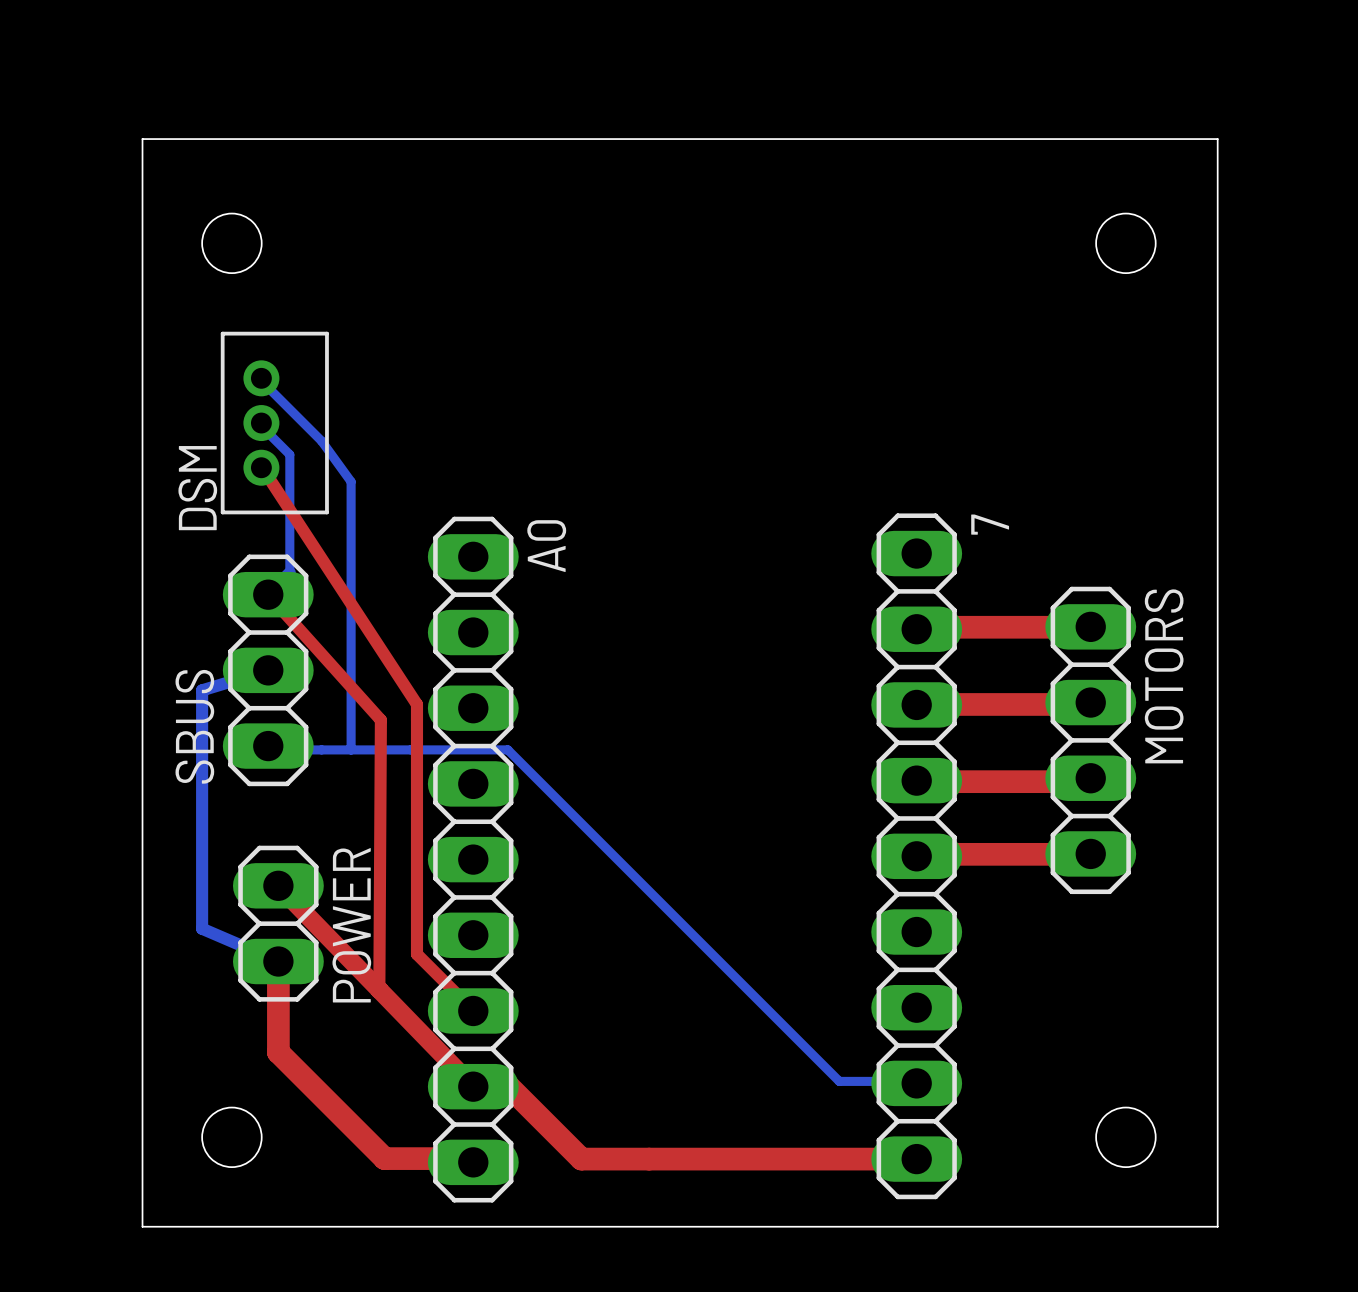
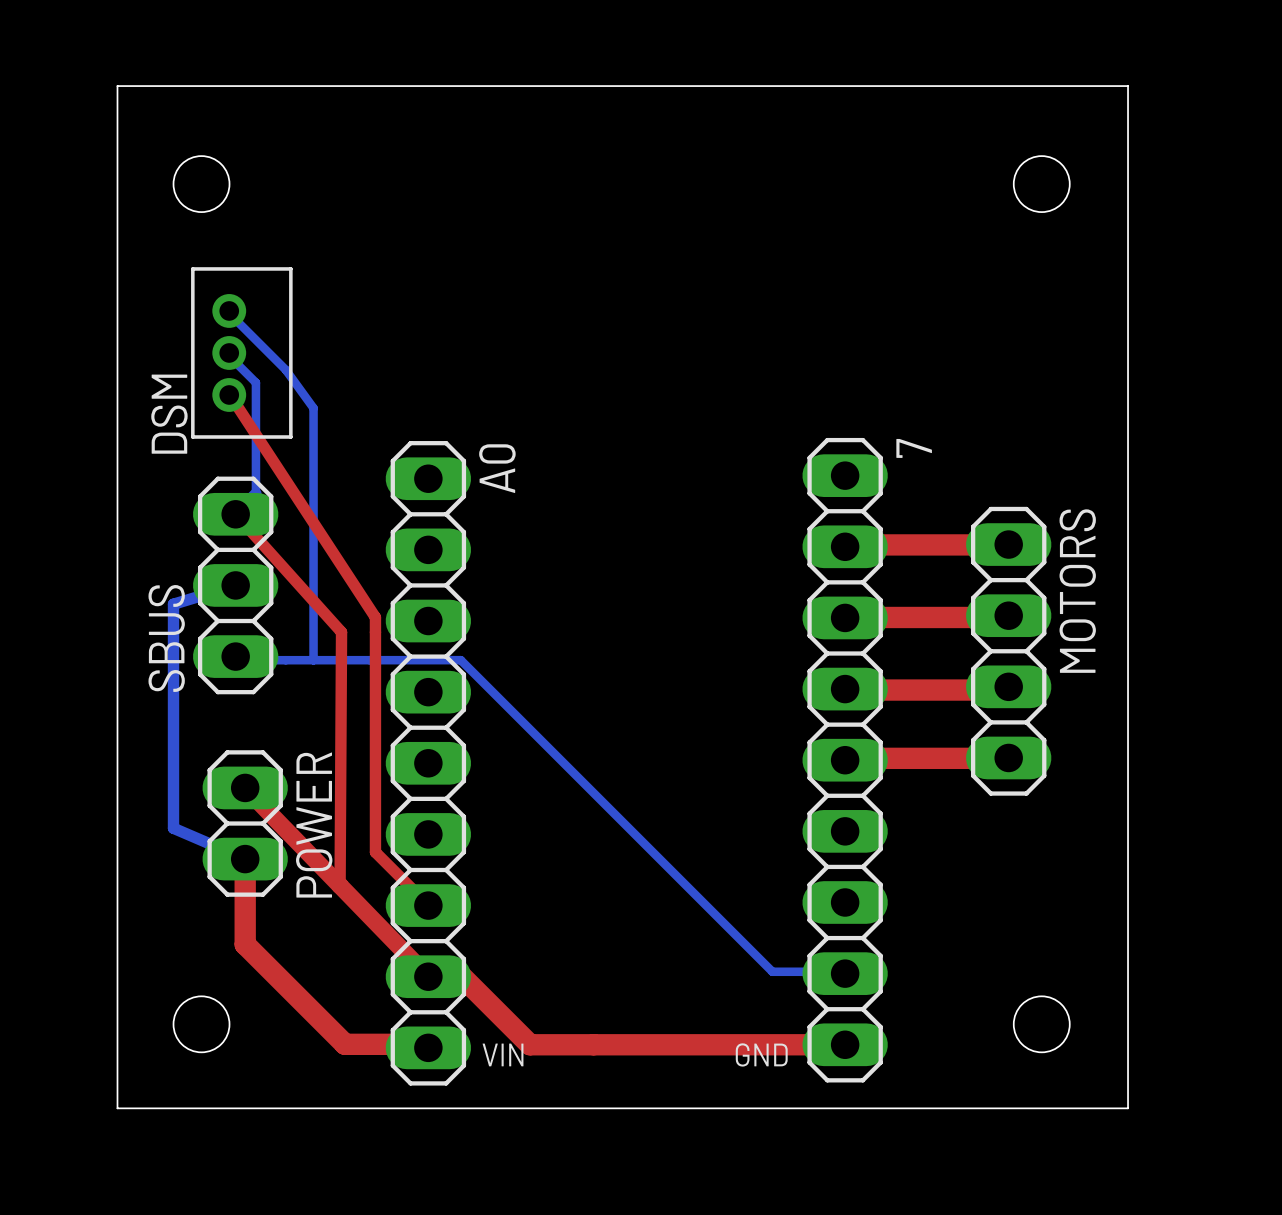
text: none -> VIN (503, 1054)
text: none -> GND (761, 1054)

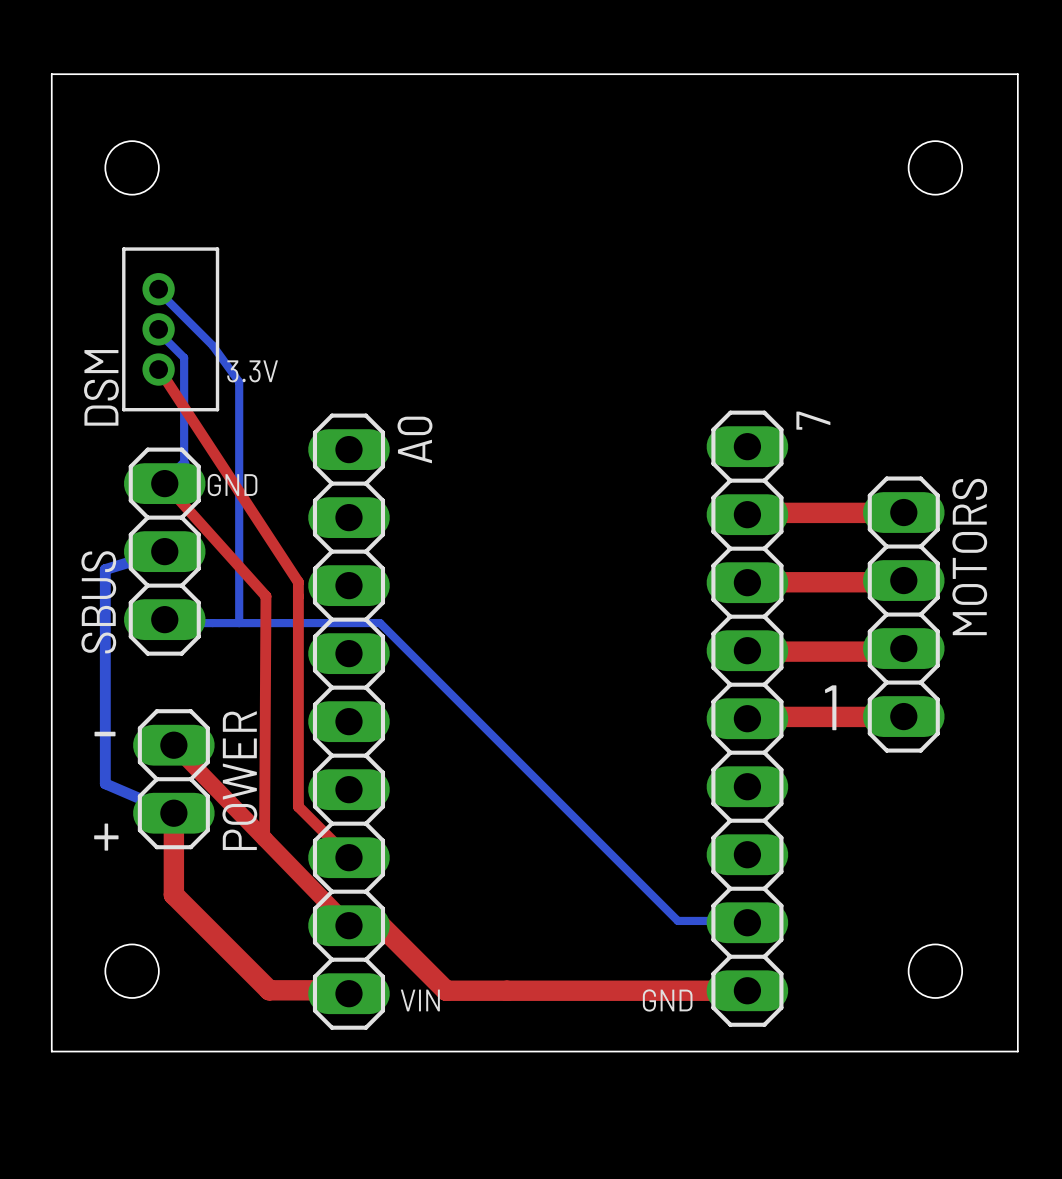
text: none -> 3.3V (252, 371)
text: none -> GND (232, 485)
text: none -> 1 (830, 707)
text: none -> - (105, 734)
text: none -> + (106, 837)

